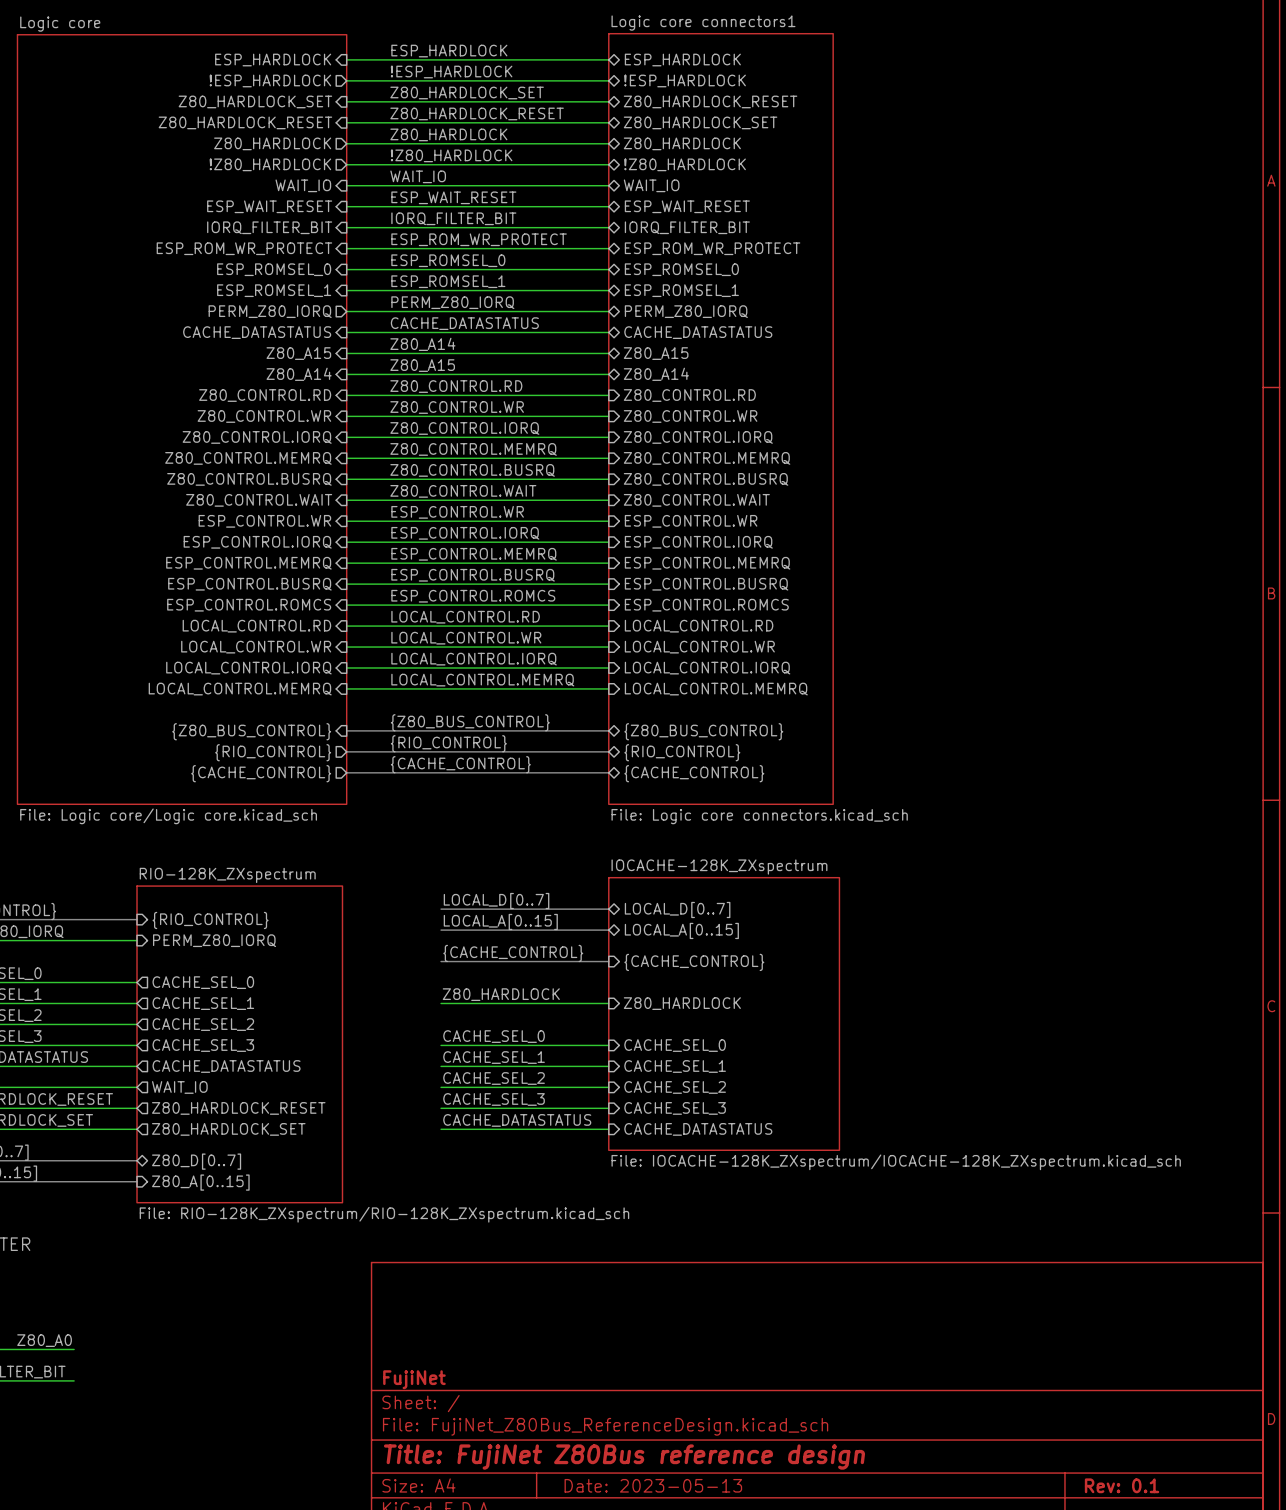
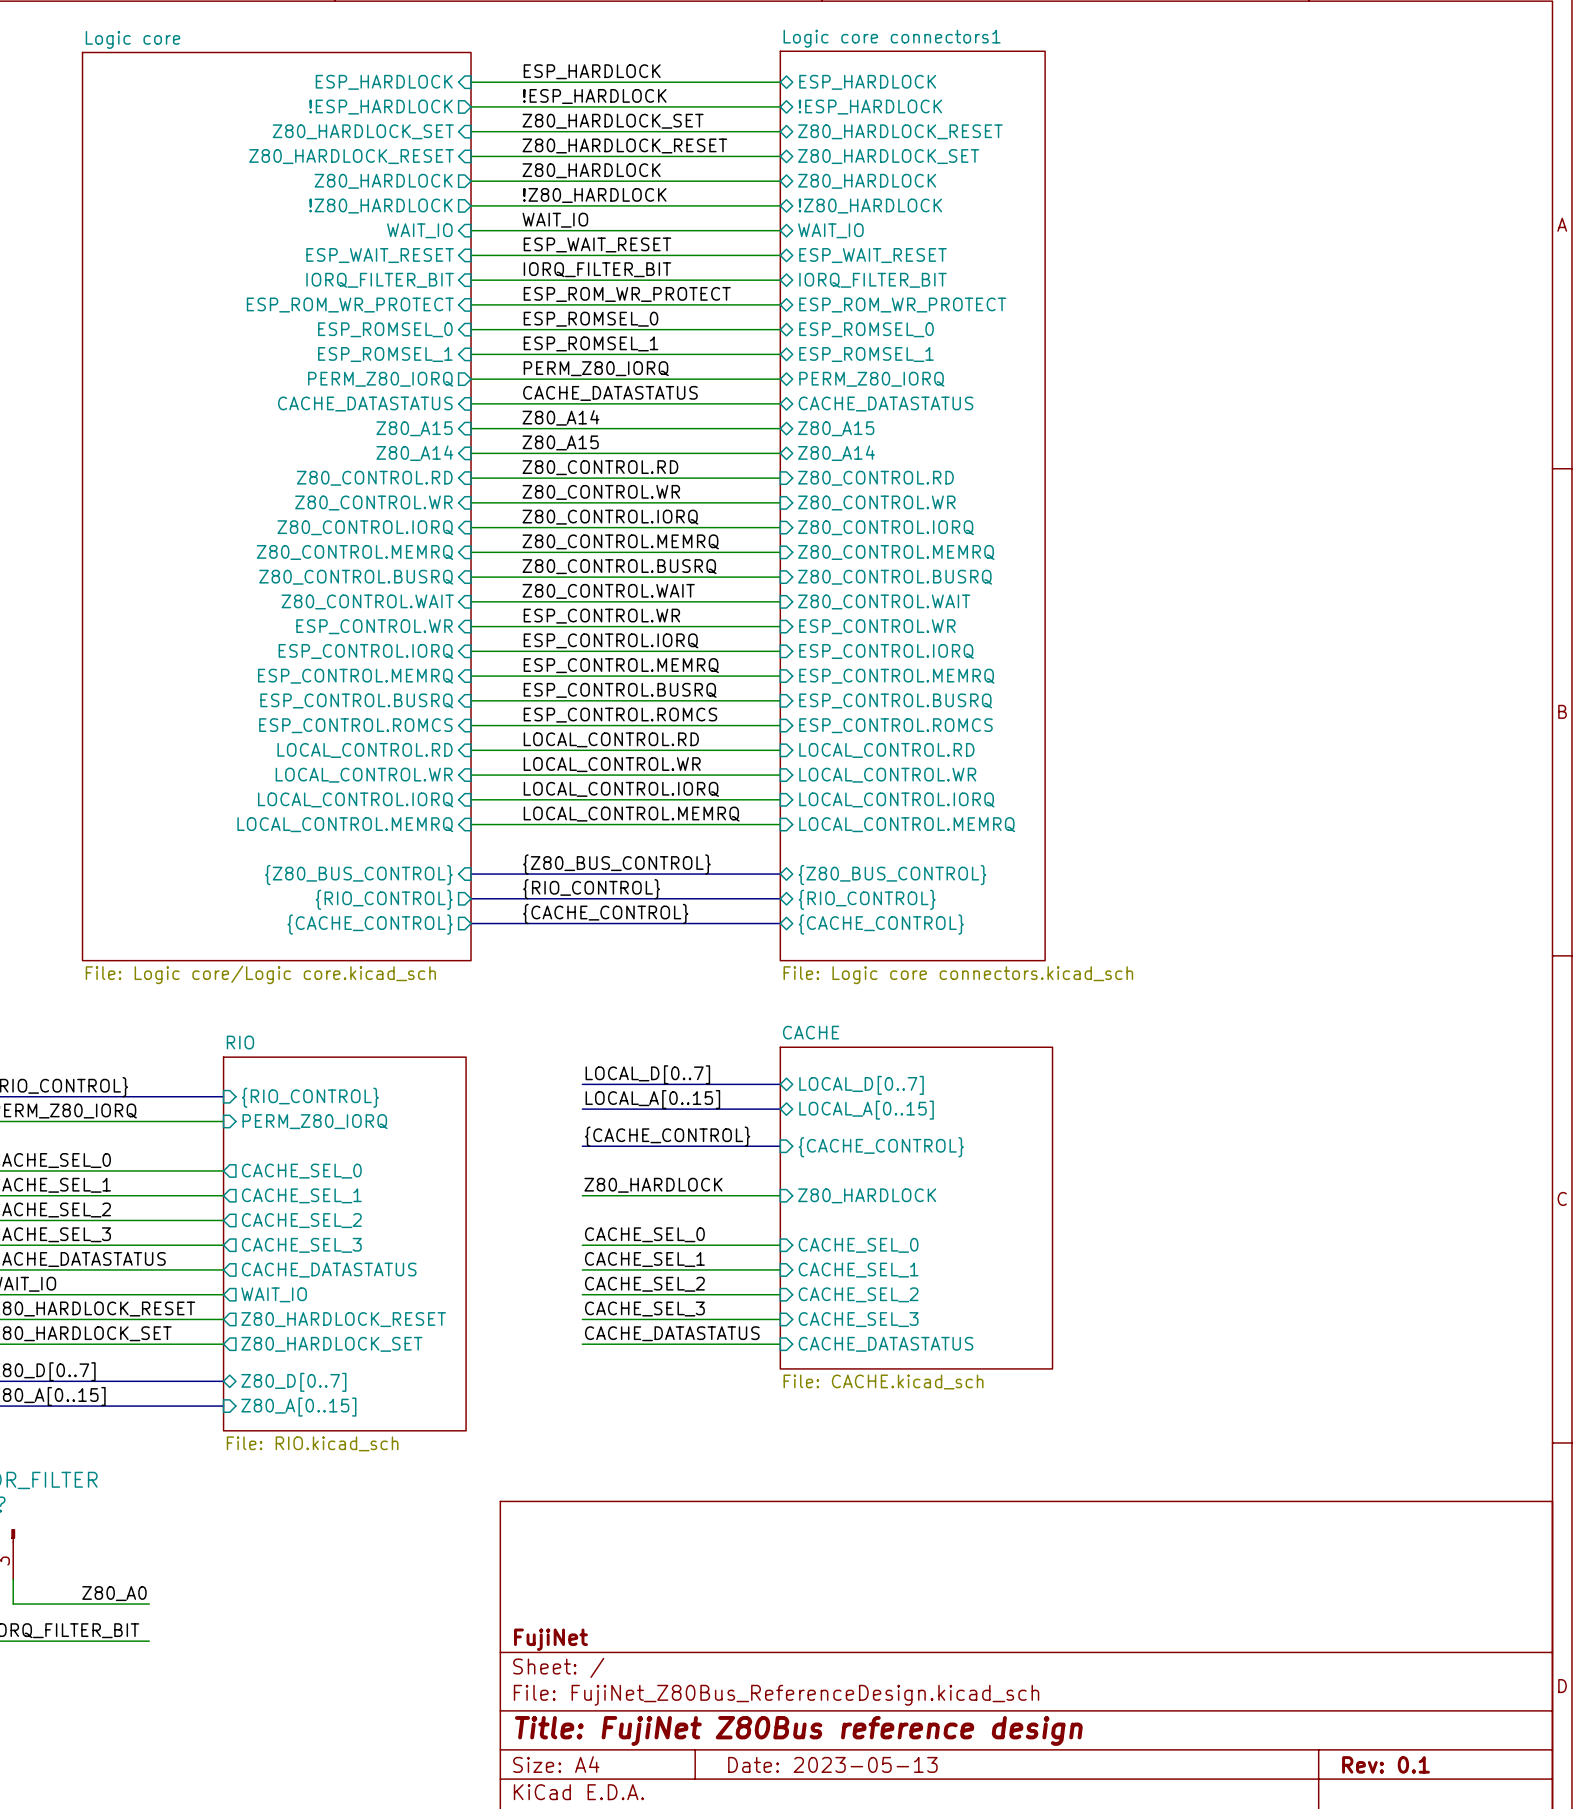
sheet IOCACHE-128K_ZXspectrum name: IOCACHE-128K_ZXspectrum (719, 867) -> CACHE (811, 1032)
sheet RIO-128K_ZXspectrum name: RIO-128K_ZXspectrum (227, 875) -> RIO (240, 1042)
sheet IOCACHE-128K_ZXspectrum value: File: IOCACHE-128K_ZXspectrum/IOCACHE-128K_ZXspectrum.kicad_sch (896, 1162) -> File: CACHE.kicad_sch (883, 1382)
sheet RIO-128K_ZXspectrum value: File: RIO-128K_ZXspectrum/RIO-128K_ZXspectrum.kicad_sch (384, 1214) -> File: RIO.kicad_sch (312, 1443)

